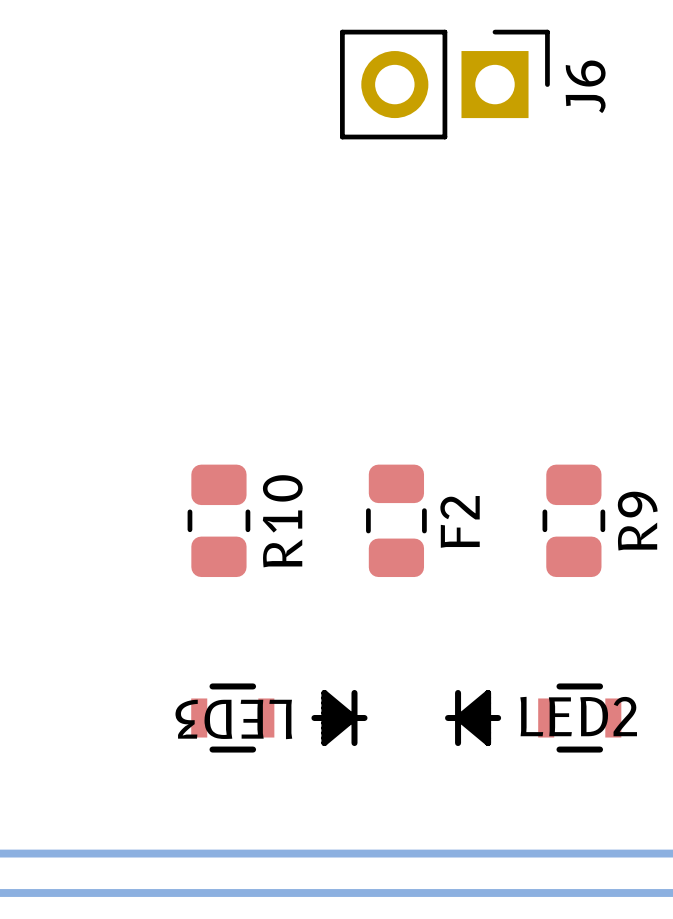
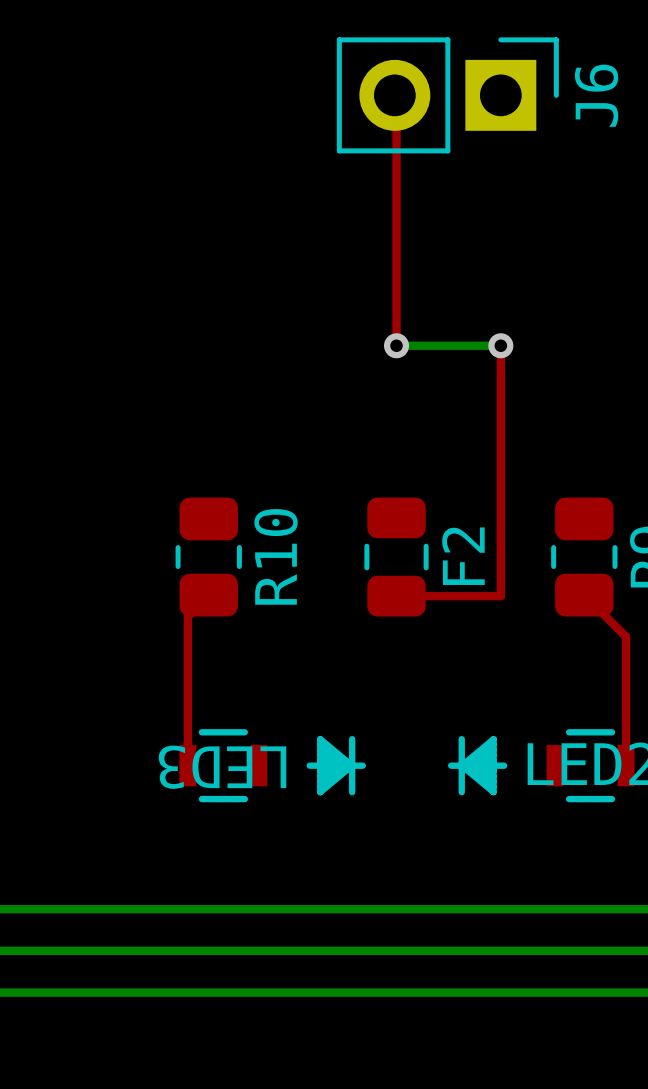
top track: none -> (394, 95) (396, 95) (396, 345)
bottom track: none -> (396, 345) (500, 345)
via: none -> (396, 345)
top track: none -> (500, 345) (500, 596) (396, 596)
via: none -> (500, 345)
top track: none -> (208, 595) (187, 617) (187, 765)
top track: none -> (584, 595) (626, 636) (626, 765)

